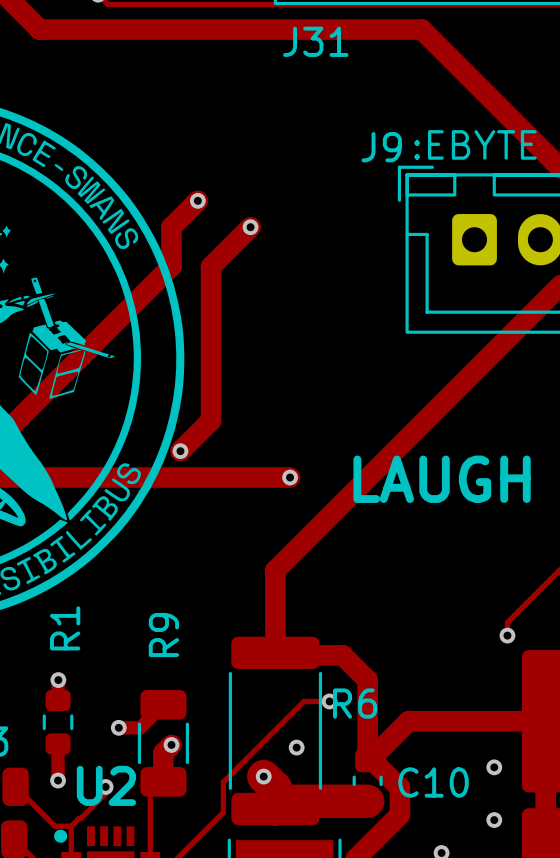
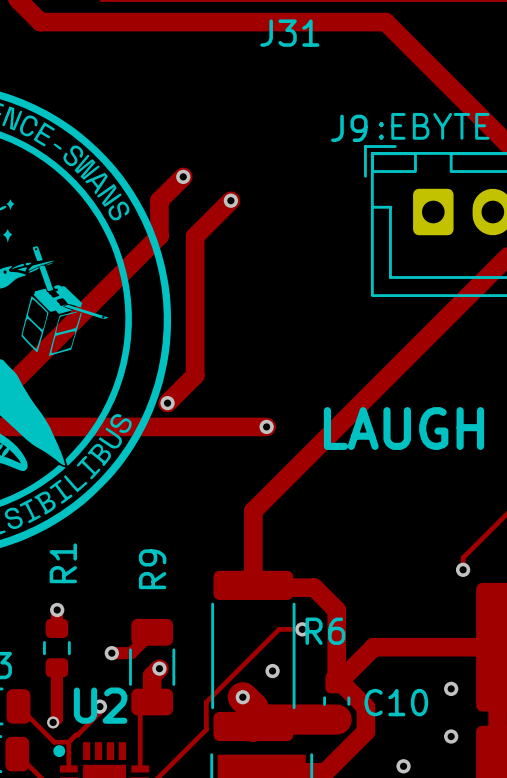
track: none -> (56, 700) (56, 718) (53, 722)
via: (58, 780) -> none
via: none -> (53, 722)

